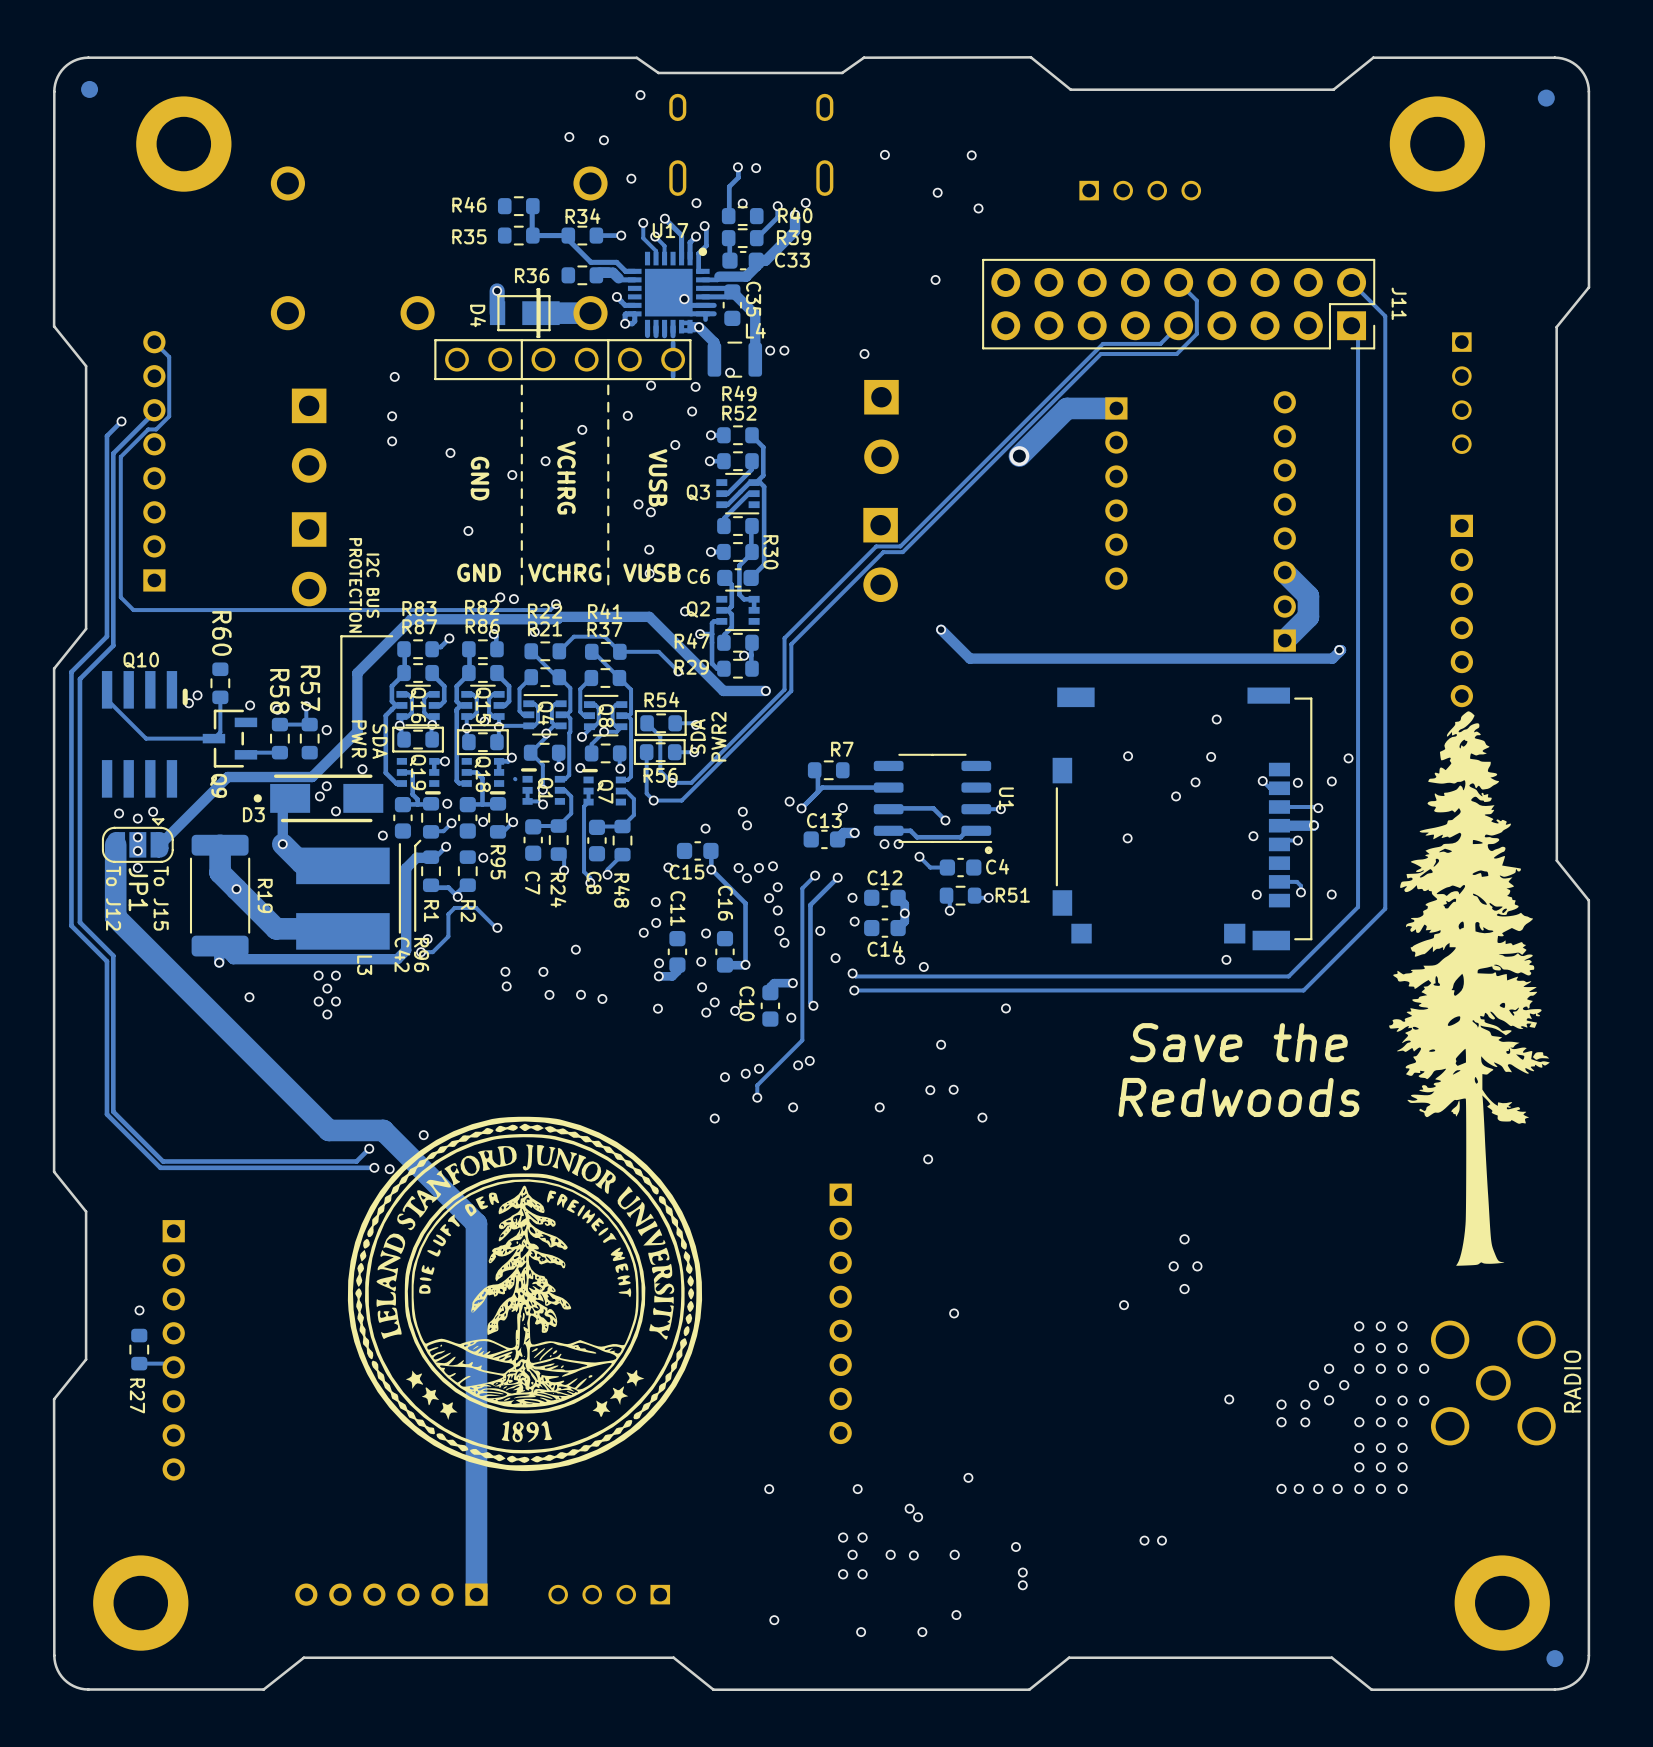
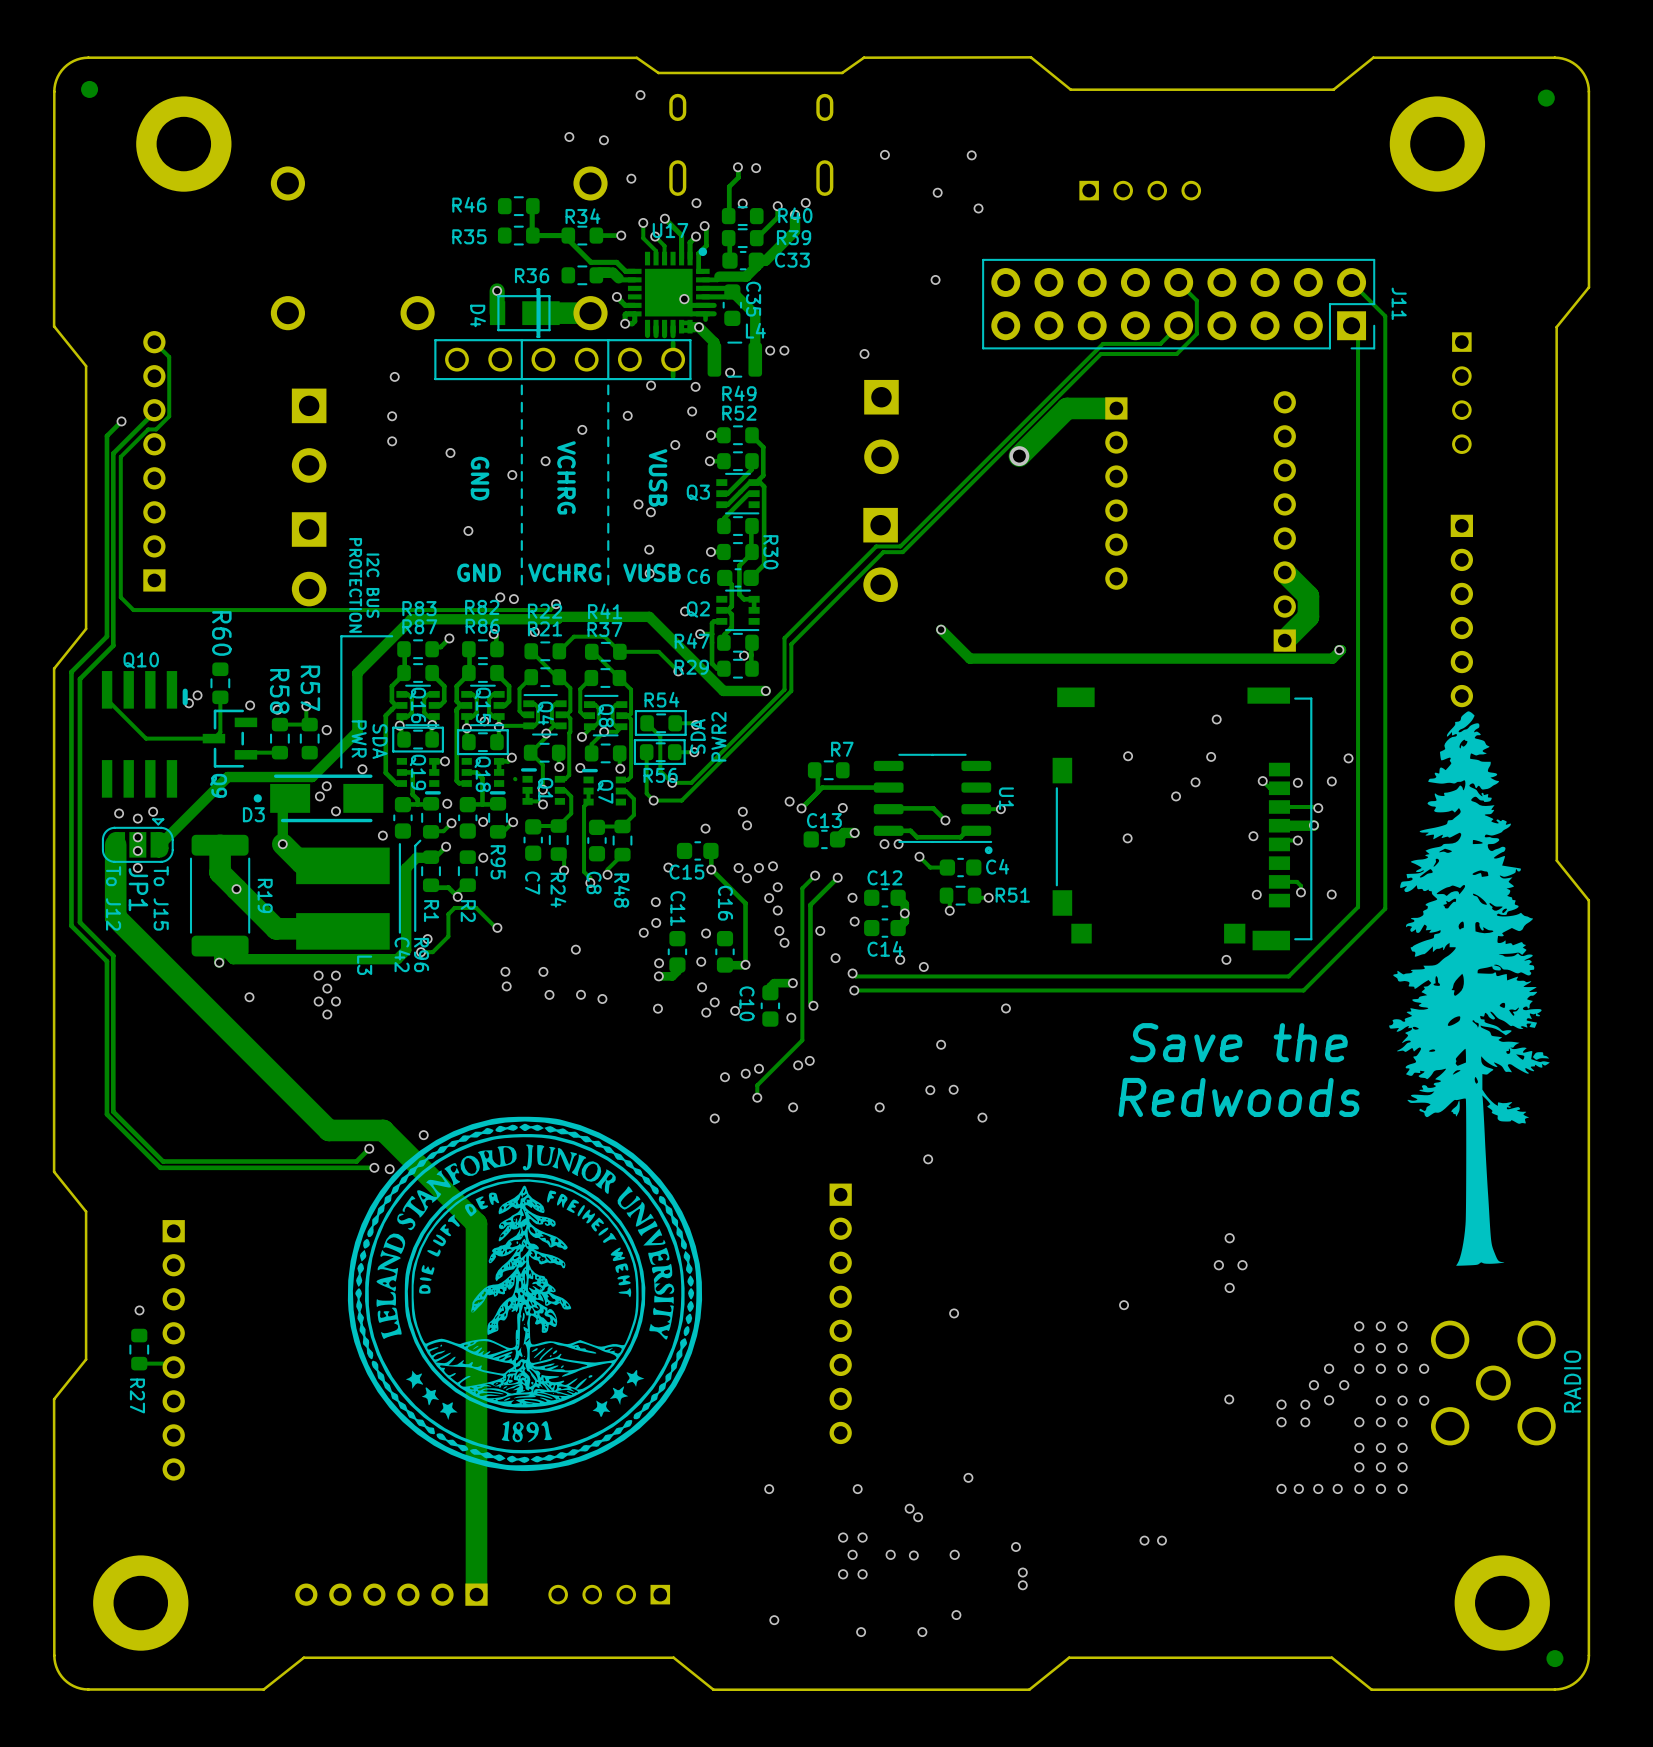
via: none -> (1229, 1238)
via: (1184, 1239) -> none
via: none -> (1218, 1265)
via: none -> (1242, 1265)
via: (1173, 1266) -> none
via: (1197, 1266) -> none
via: none -> (1229, 1287)
via: (1184, 1289) -> none

